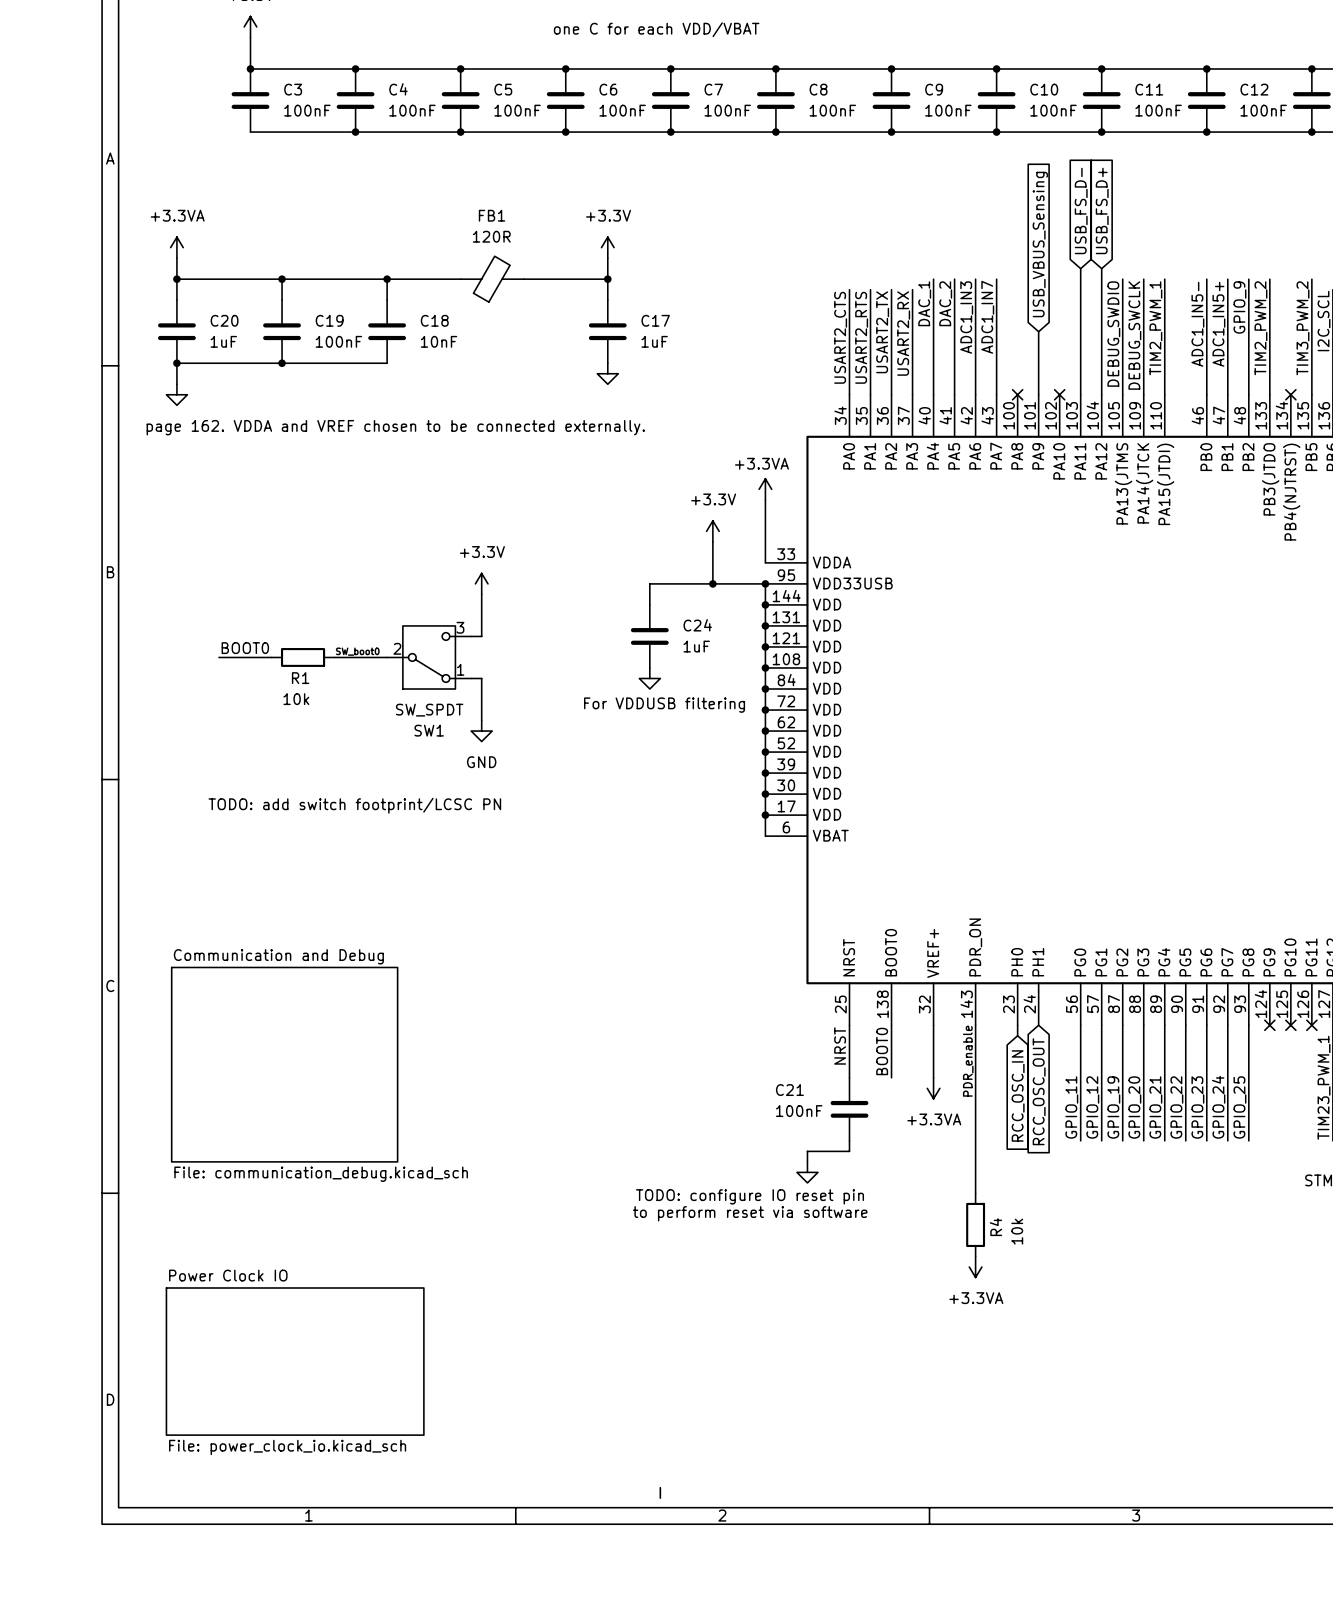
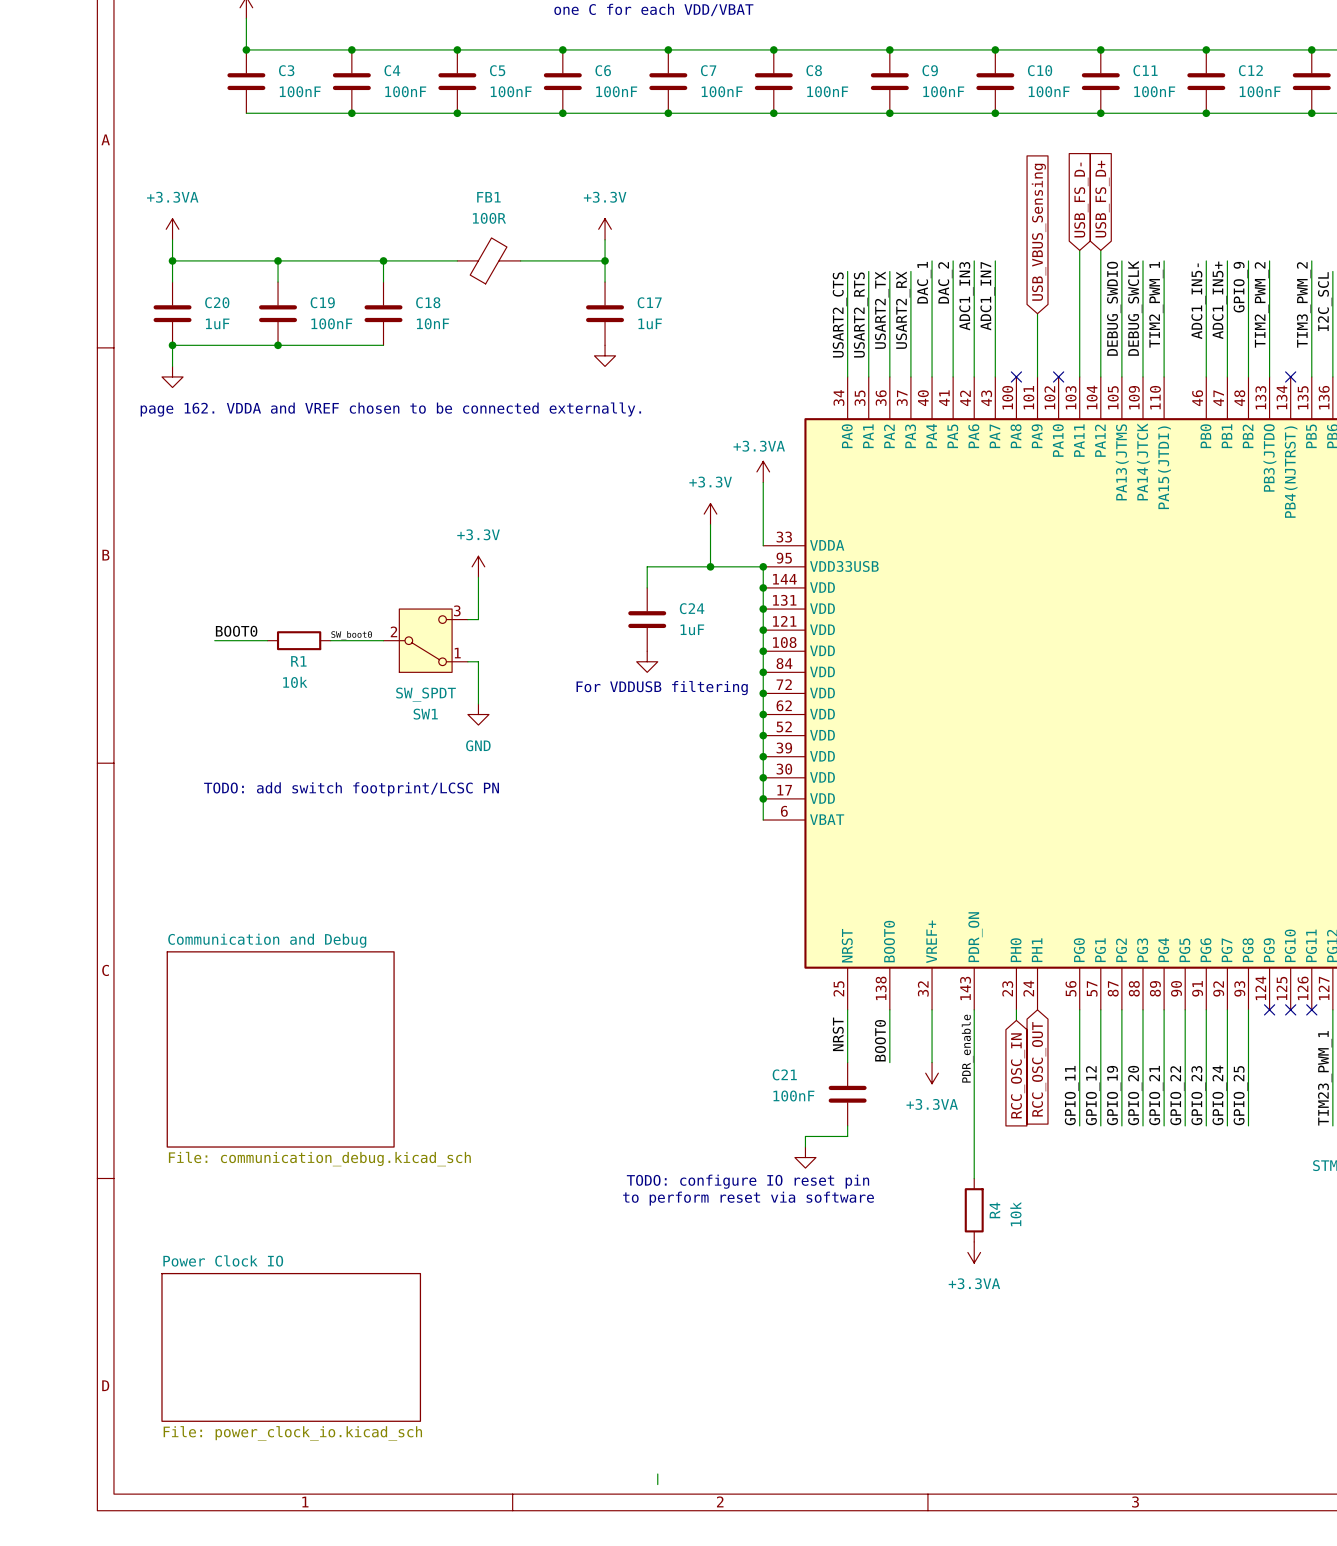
FB1 value: 120R (491, 236) -> 100R (489, 218)

